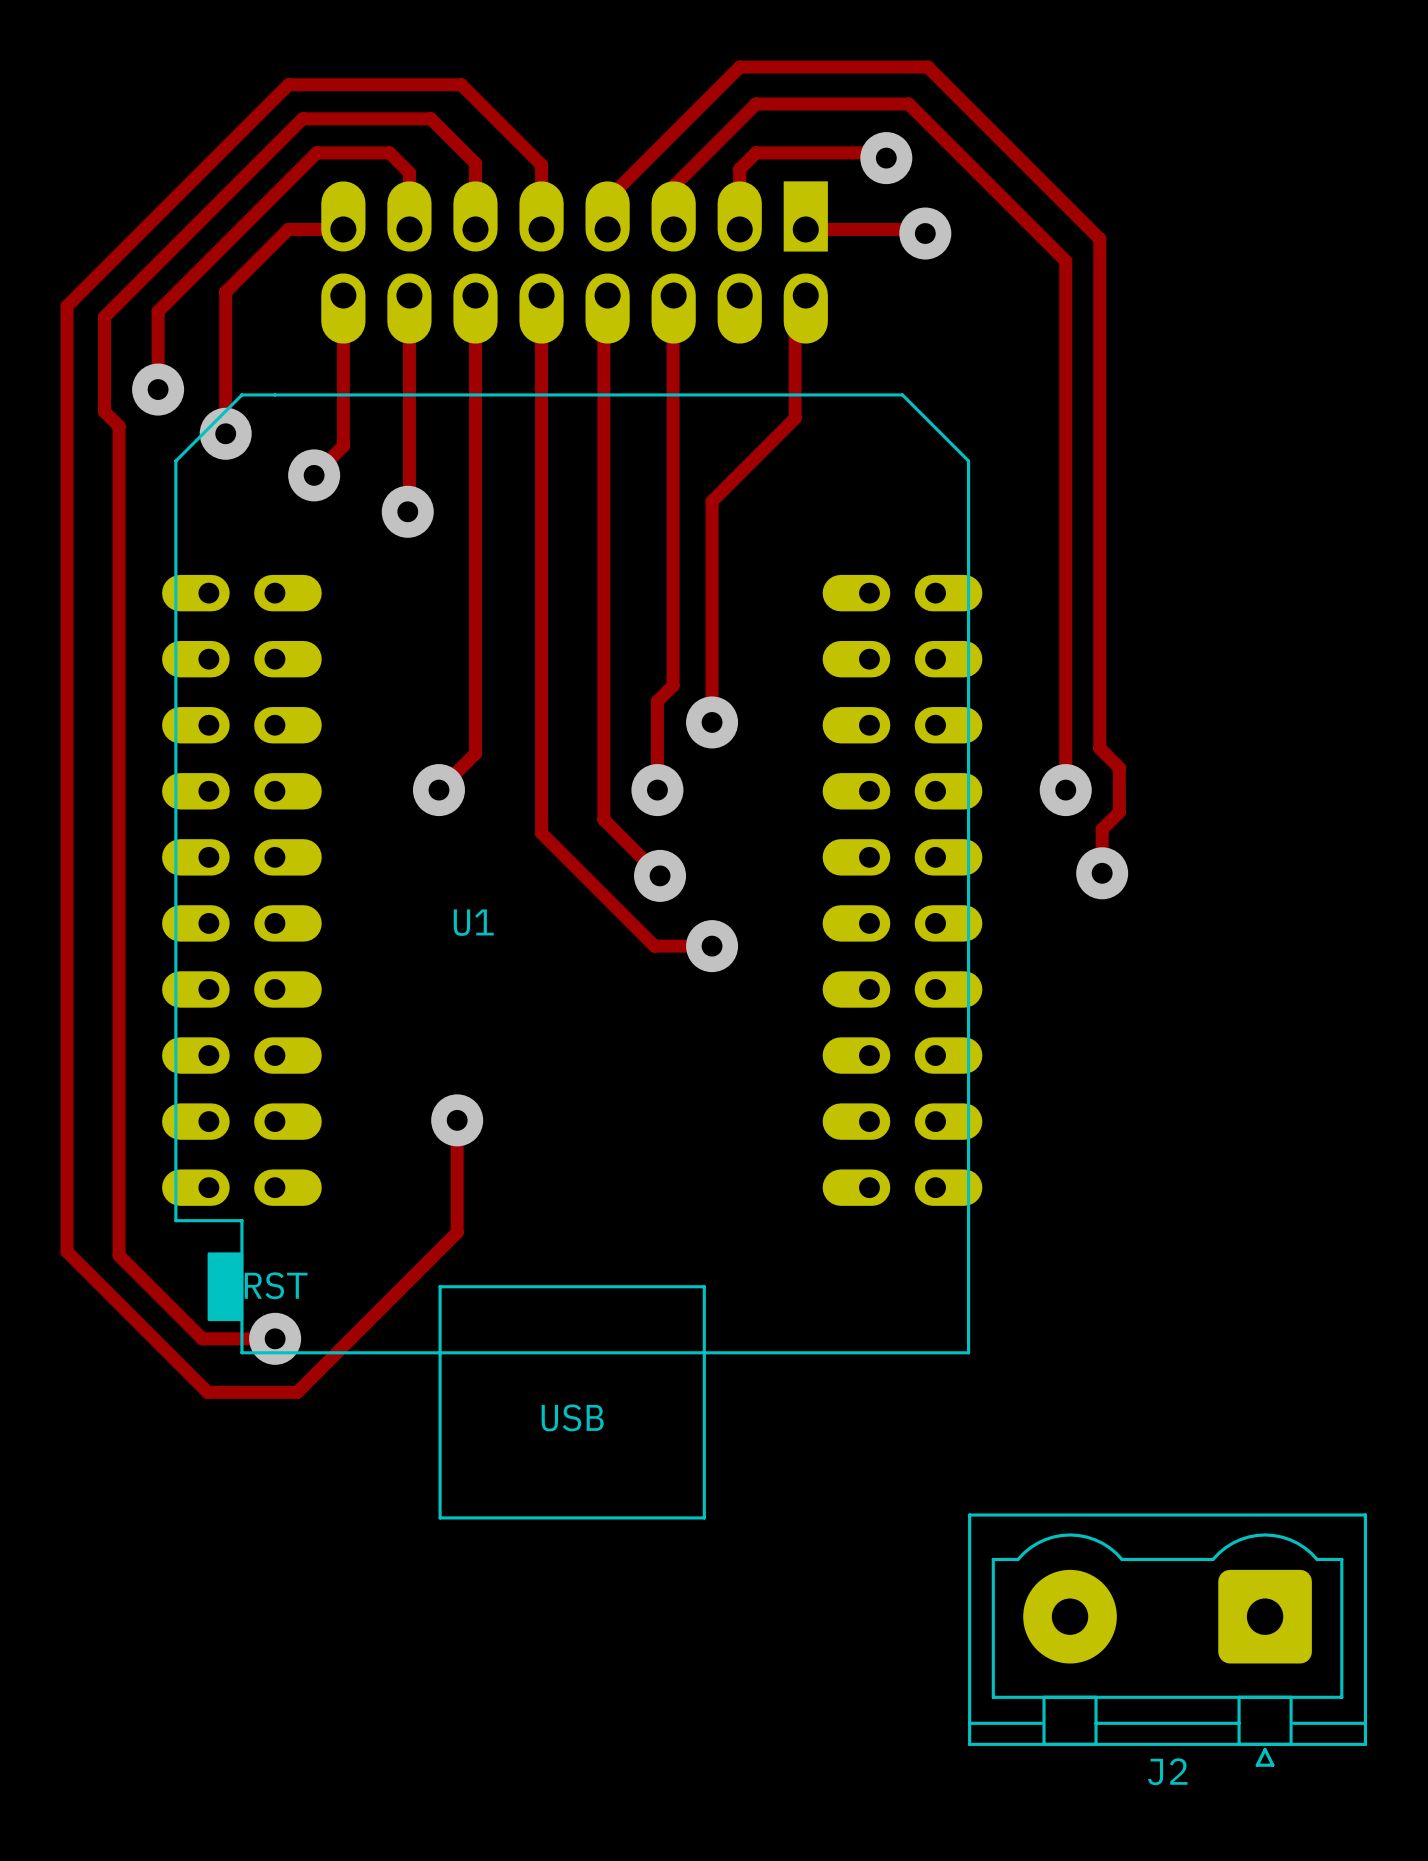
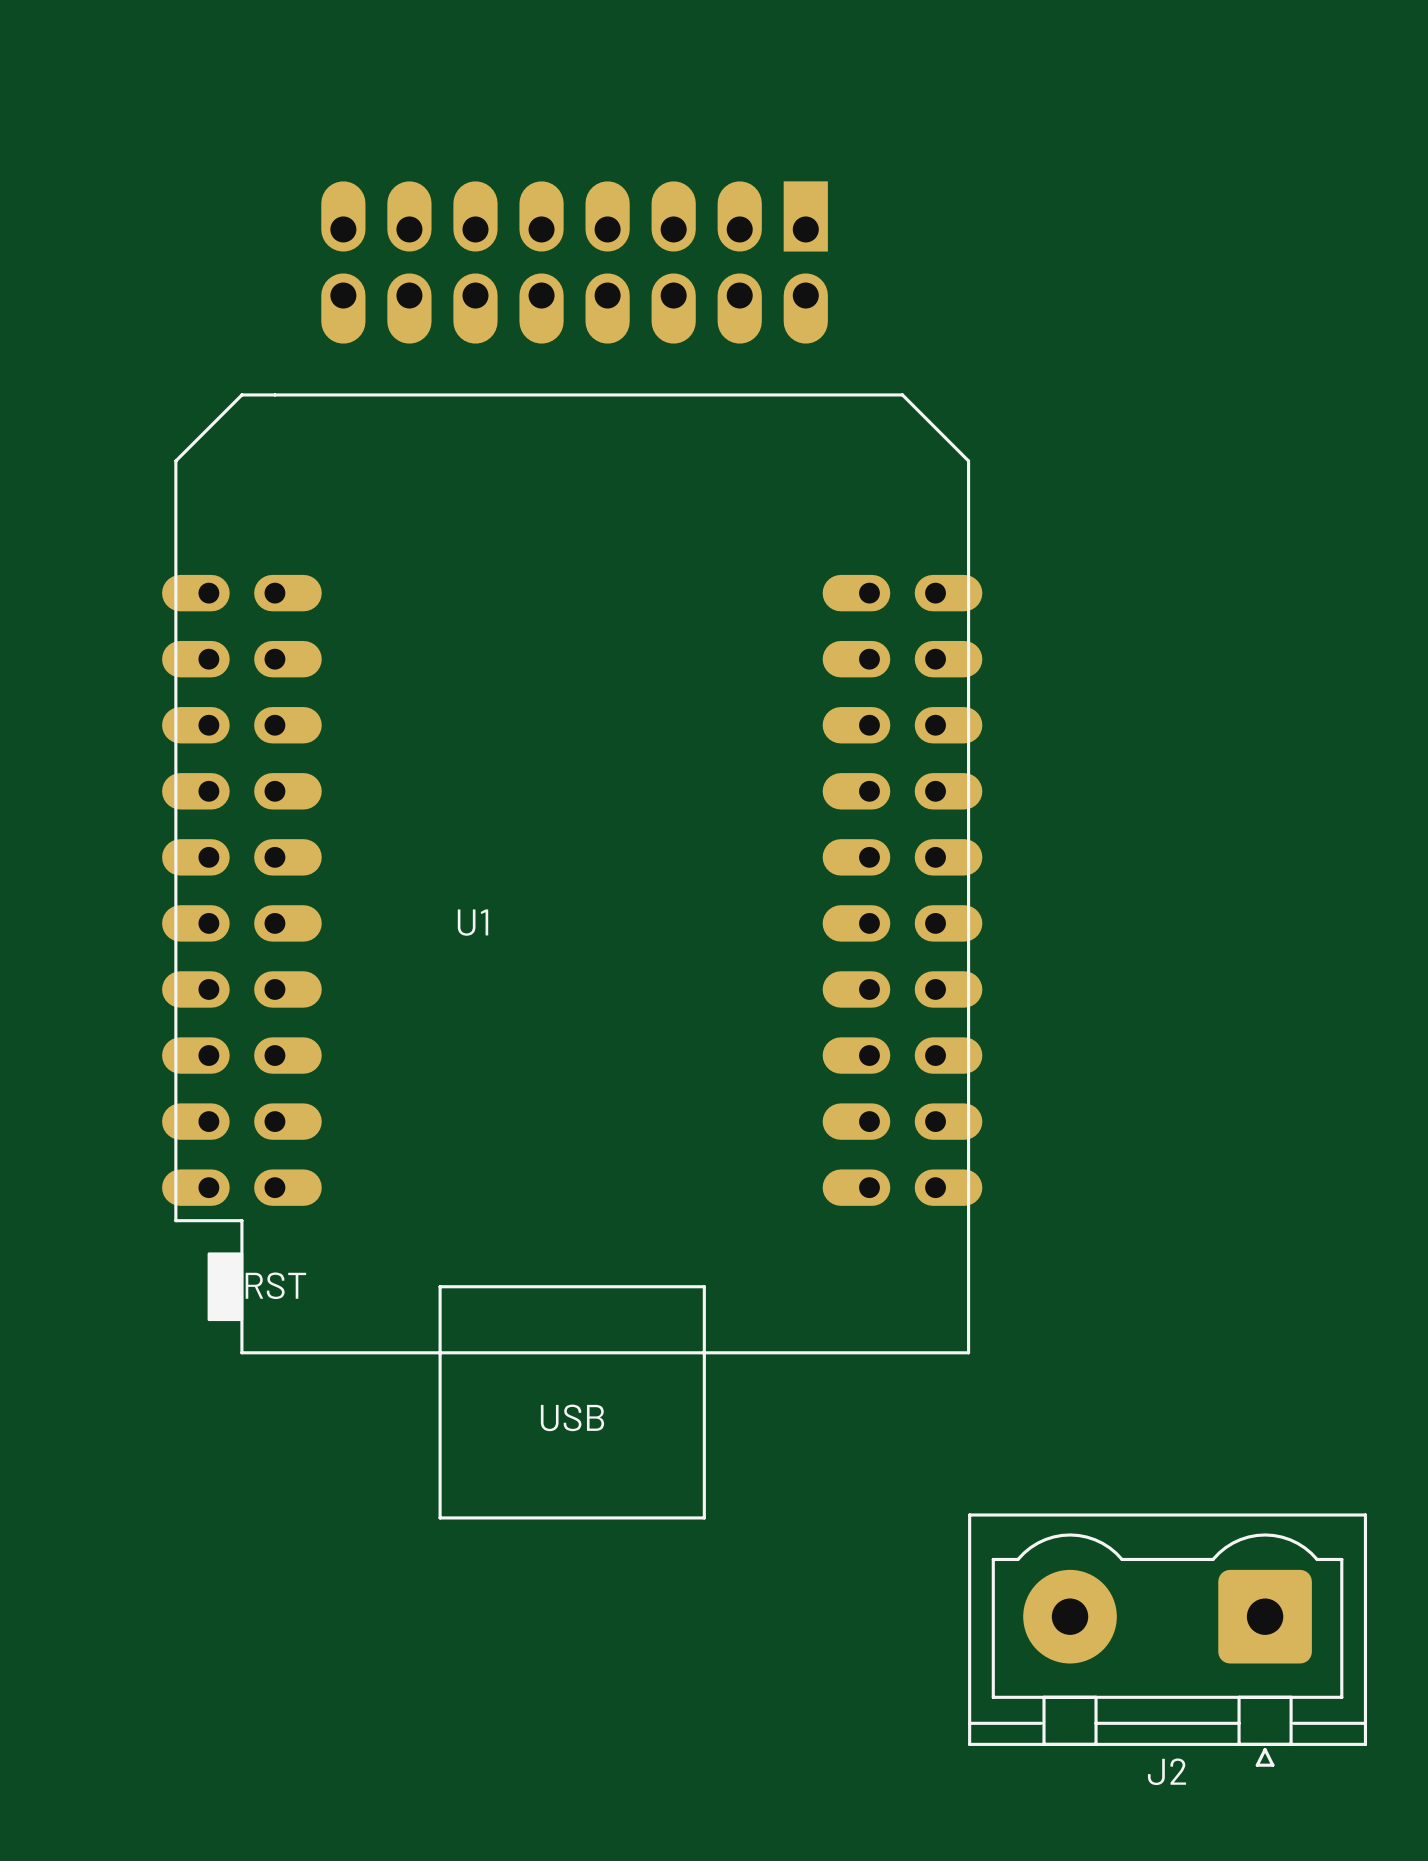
track: (886, 158) (881, 152) (755, 152) (739, 169) (739, 229) -> none
via: (886, 158) -> none
track: (343, 229) (288, 229) (225, 292) (225, 433) -> none
track: (409, 229) (409, 172) (389, 152) (316, 152) (158, 311) (158, 389) -> none
track: (475, 229) (475, 163) (430, 118) (302, 118) (104, 316) (104, 411) (119, 426) (119, 1255) (202, 1338) (275, 1338) -> none
track: (541, 229) (541, 164) (461, 84) (288, 84) (67, 306) (67, 1251) (207, 1392) (297, 1392) (457, 1232) (457, 1120) -> none
track: (607, 229) (607, 199) (739, 67) (927, 67) (1099, 238) (1099, 748) (1119, 767) (1119, 812) (1102, 829) (1102, 873) -> none
track: (673, 229) (673, 186) (755, 104) (908, 104) (1065, 261) (1065, 790) -> none
track: (805, 229) (921, 229) (925, 233) -> none
via: (925, 233) -> none
track: (343, 295) (343, 446) (314, 475) -> none
track: (409, 295) (409, 510) (407, 511) -> none
track: (475, 295) (475, 753) (438, 790) -> none
track: (541, 295) (541, 833) (654, 946) (712, 946) -> none
track: (607, 295) (603, 299) (603, 819) (660, 875) -> none
track: (673, 295) (673, 685) (657, 701) (657, 790) -> none
track: (805, 295) (795, 306) (795, 418) (712, 501) (712, 722) -> none
via: (158, 389) -> none
via: (225, 433) -> none
via: (314, 475) -> none
via: (407, 511) -> none
via: (712, 722) -> none
via: (438, 790) -> none
via: (657, 790) -> none
via: (1065, 790) -> none
via: (1102, 873) -> none
via: (660, 875) -> none
via: (712, 946) -> none
via: (457, 1120) -> none
via: (275, 1338) -> none

